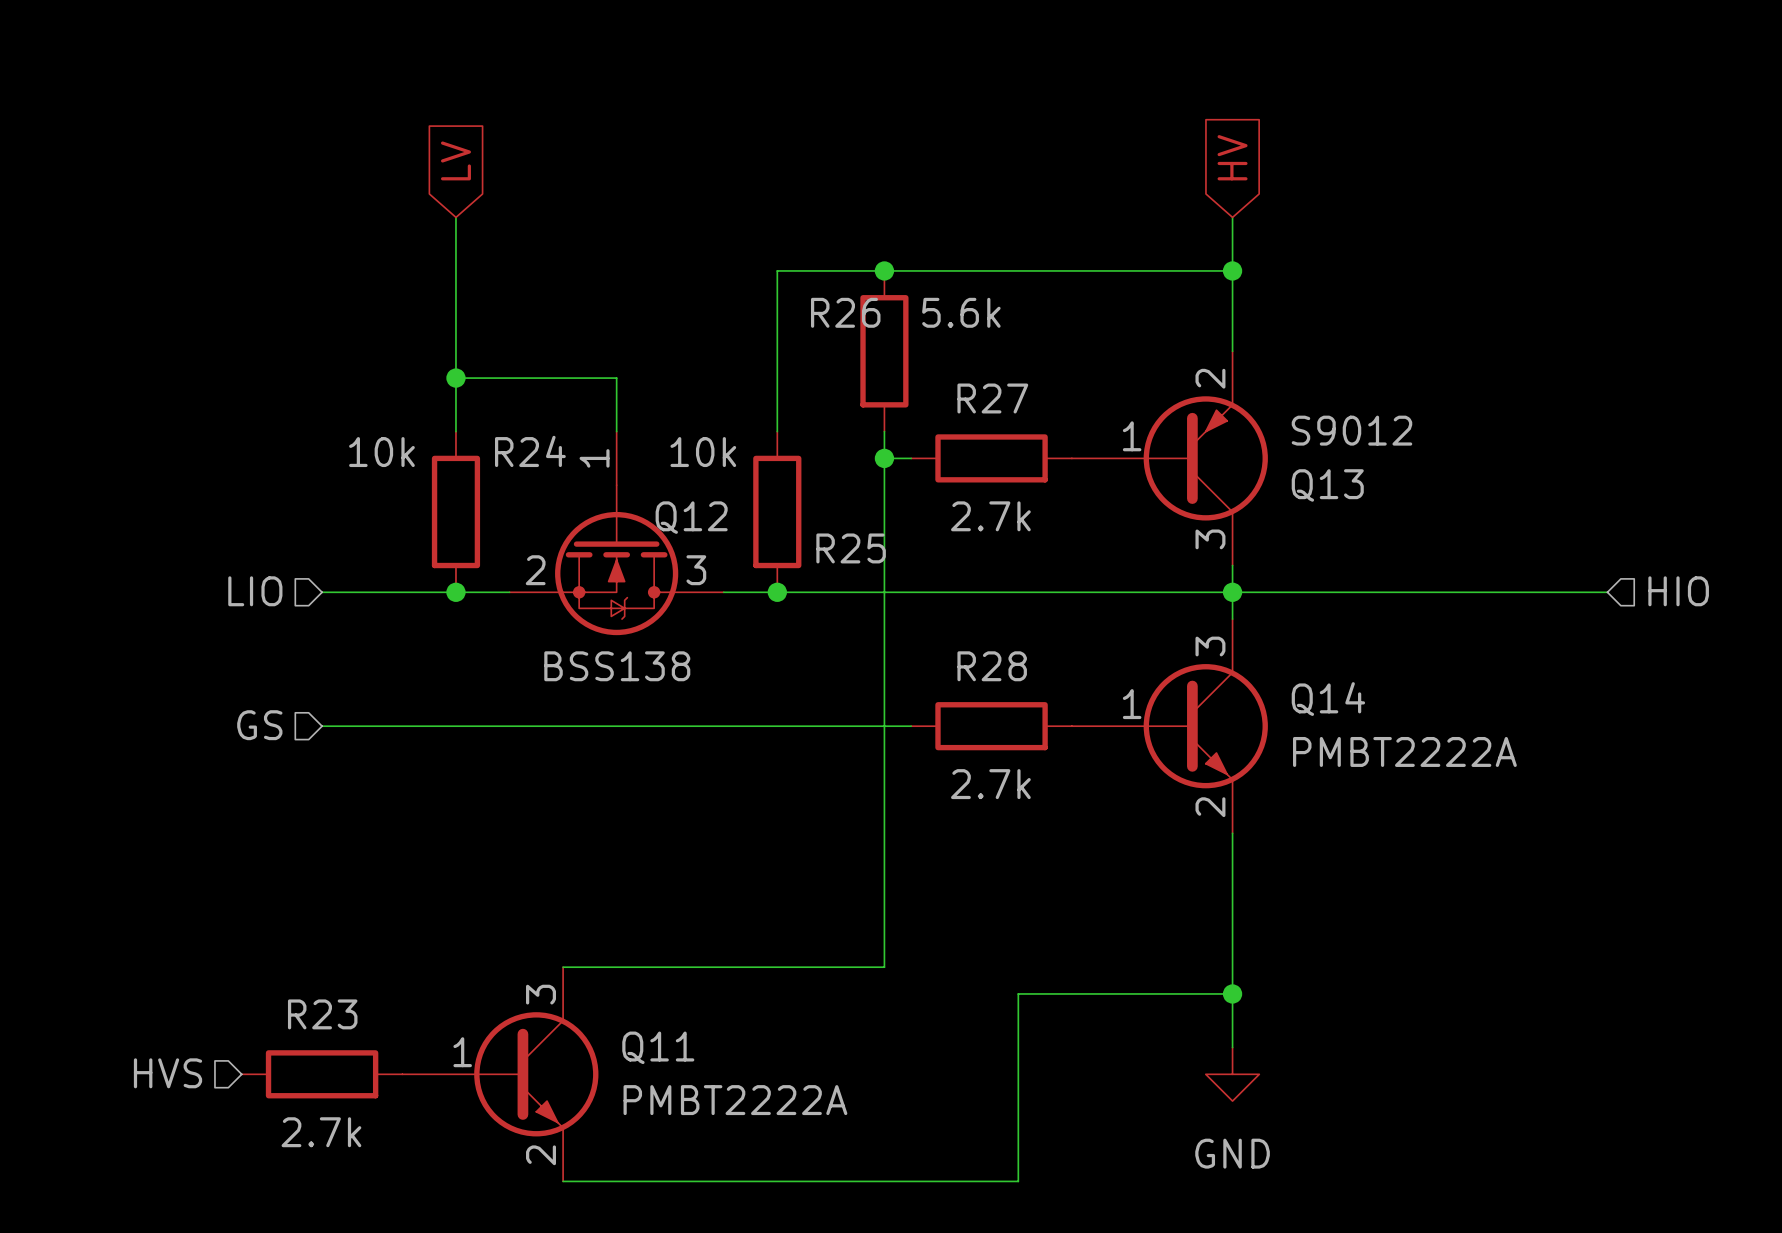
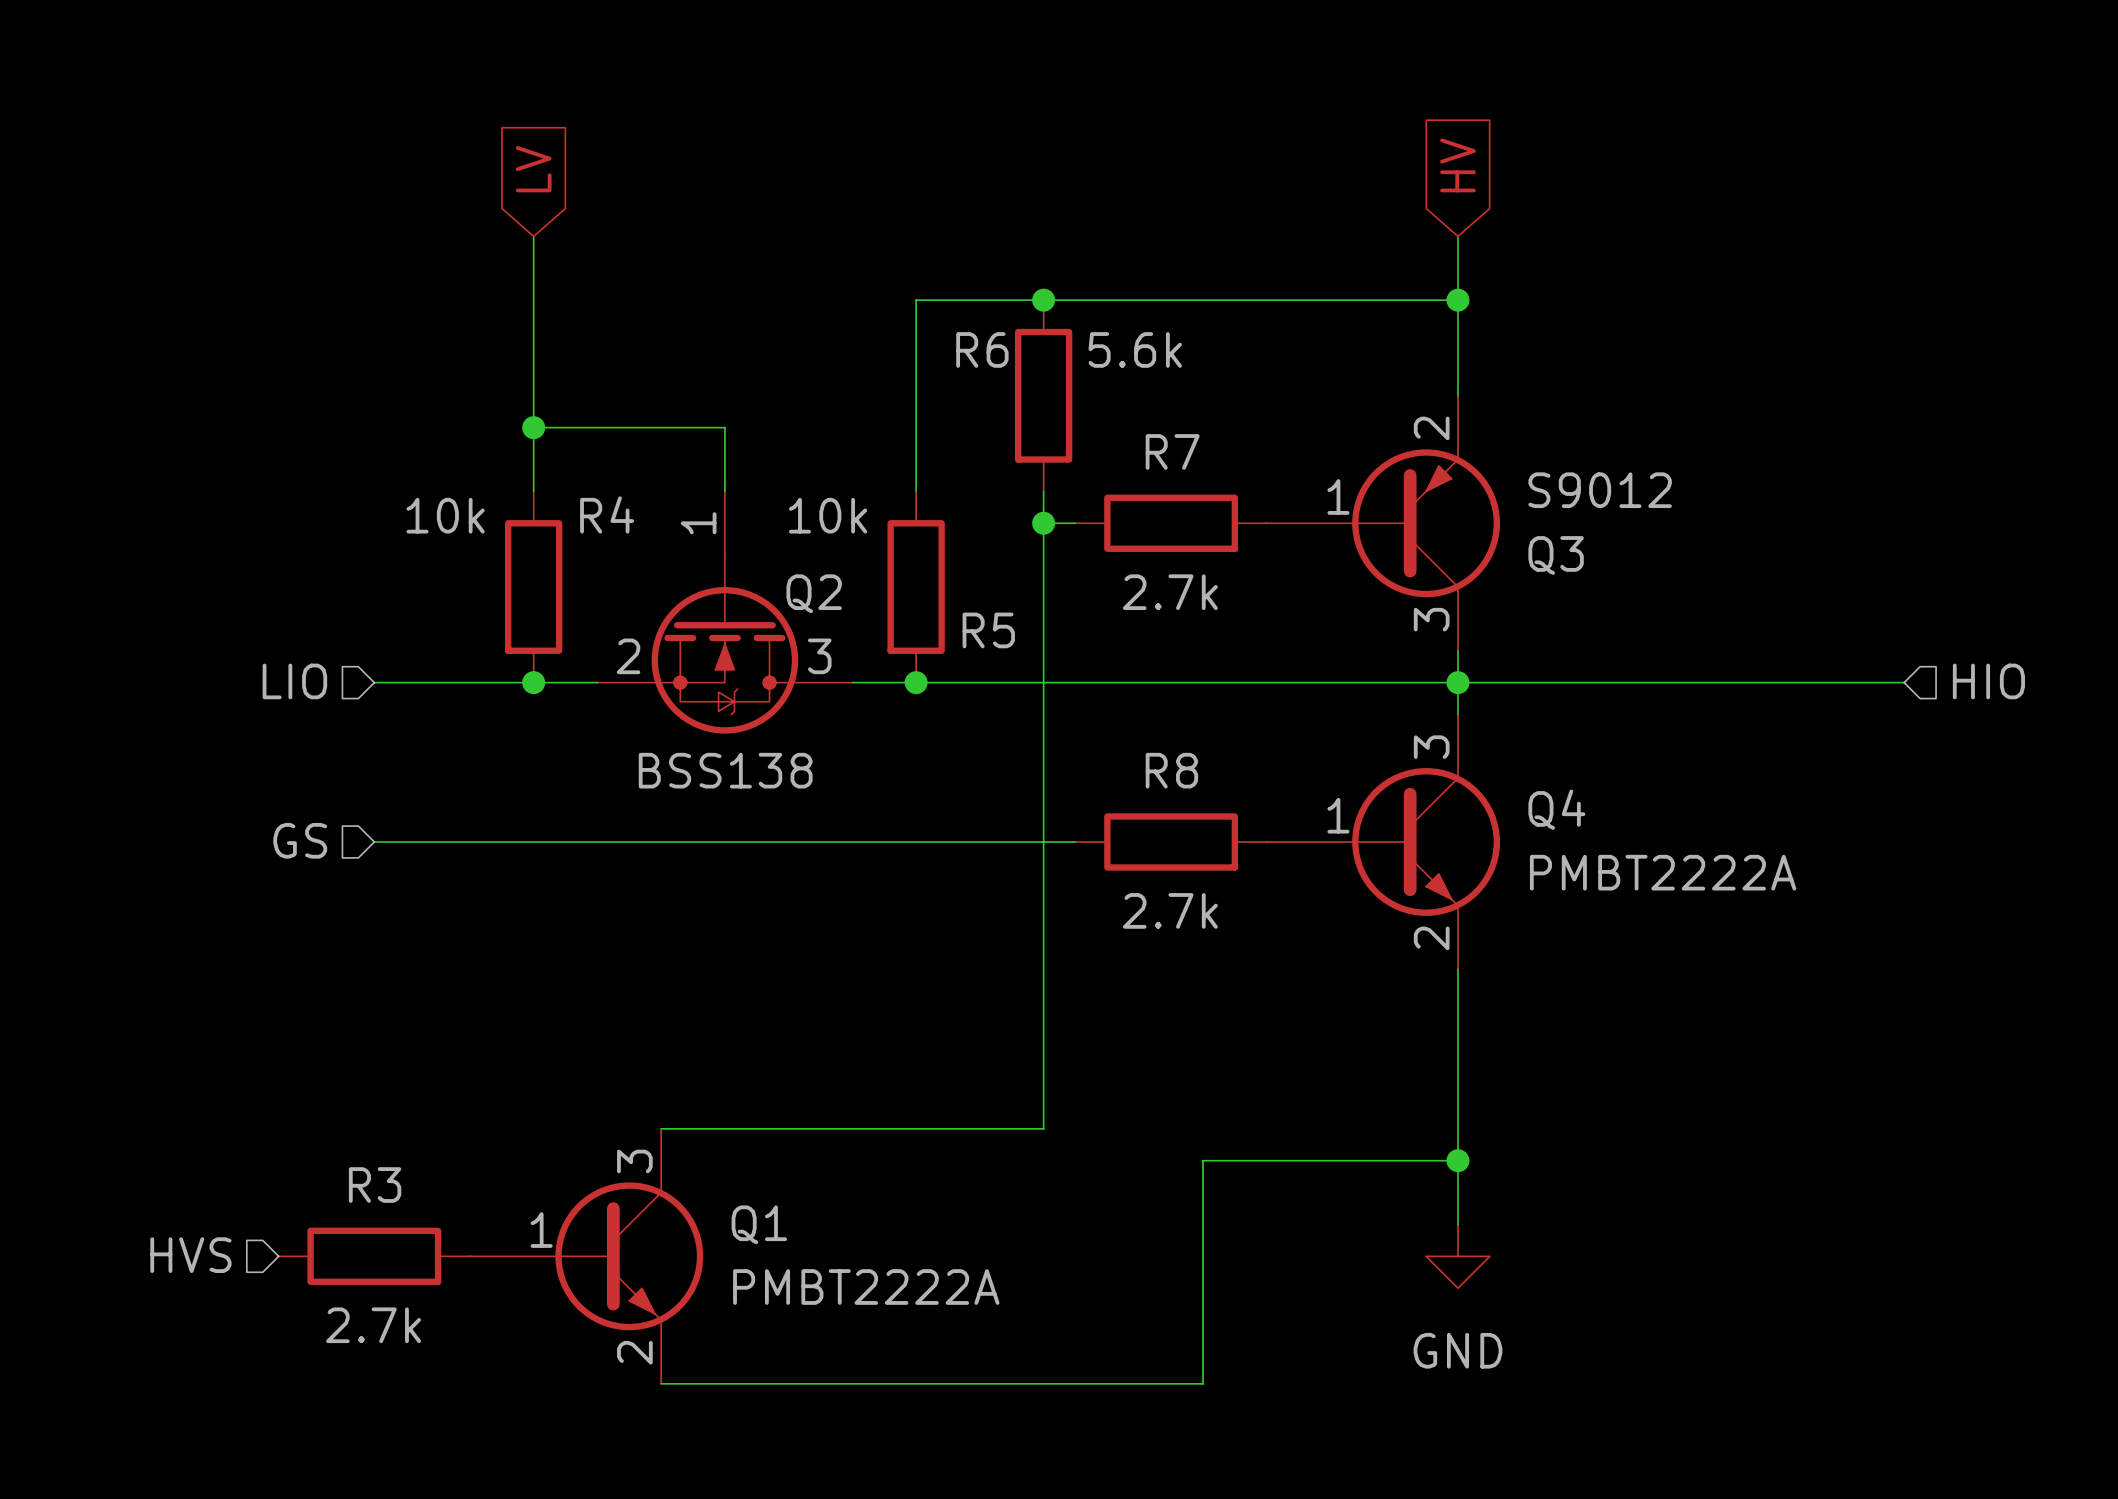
R26 name: R26 (845, 312) -> R6 (982, 349)
R27 name: R27 (992, 398) -> R7 (1172, 451)
R24 name: R24 (530, 451) -> R4 (607, 514)
Q13 name: Q13 (1327, 485) -> Q3 (1556, 555)
Q12 name: Q12 (691, 517) -> Q2 (814, 593)
R25 name: R25 (851, 548) -> R5 (988, 630)
R28 name: R28 (992, 666) -> R8 (1171, 770)
Q14 name: Q14 (1328, 699) -> Q4 (1556, 809)
R23 name: R23 (322, 1014) -> R3 (375, 1185)
Q11 name: Q11 (658, 1047) -> Q1 (759, 1224)

